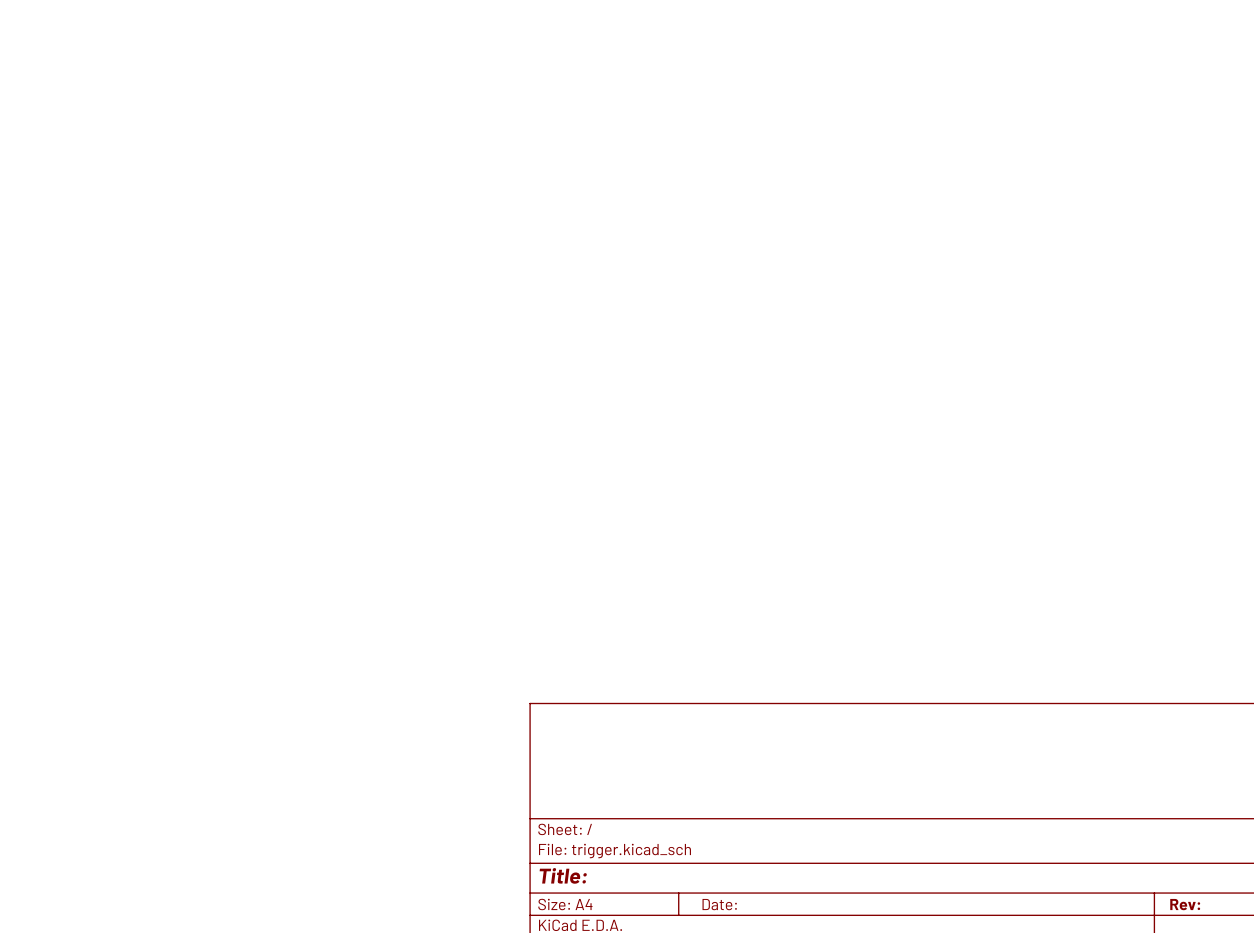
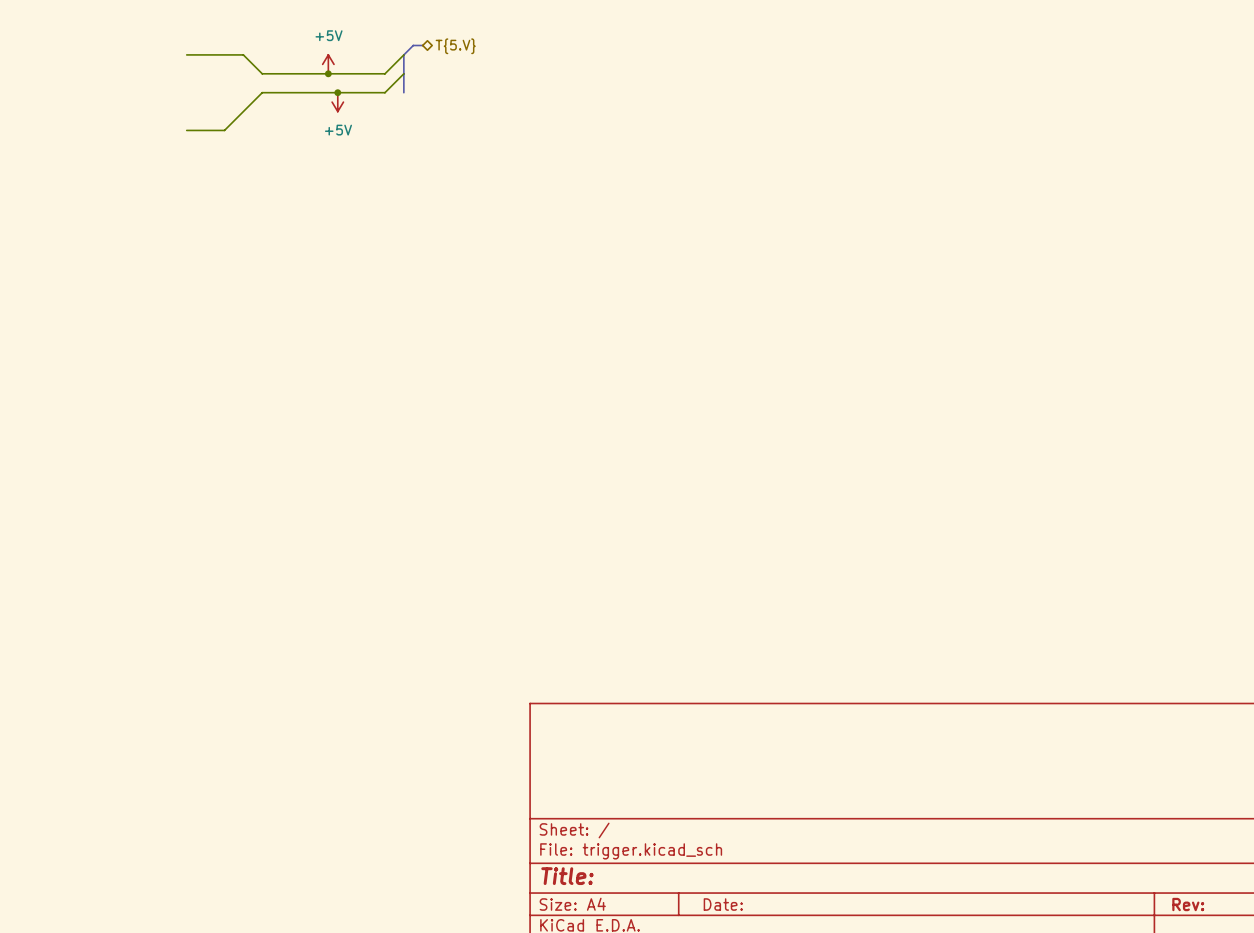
bus: none -> (422, 45) (413, 45) (403, 54) (403, 92)
hierarchical label: none -> T{5.V} (455, 46)
wire: none -> (186, 54) (243, 54) (262, 73) (384, 73) (403, 54)
power symbol: none -> +5V (328, 64)
junction: none -> (328, 73)
wire: none -> (403, 73) (384, 92) (262, 92) (224, 130) (186, 130)
junction: none -> (337, 92)
power symbol: none -> +5V (337, 102)

